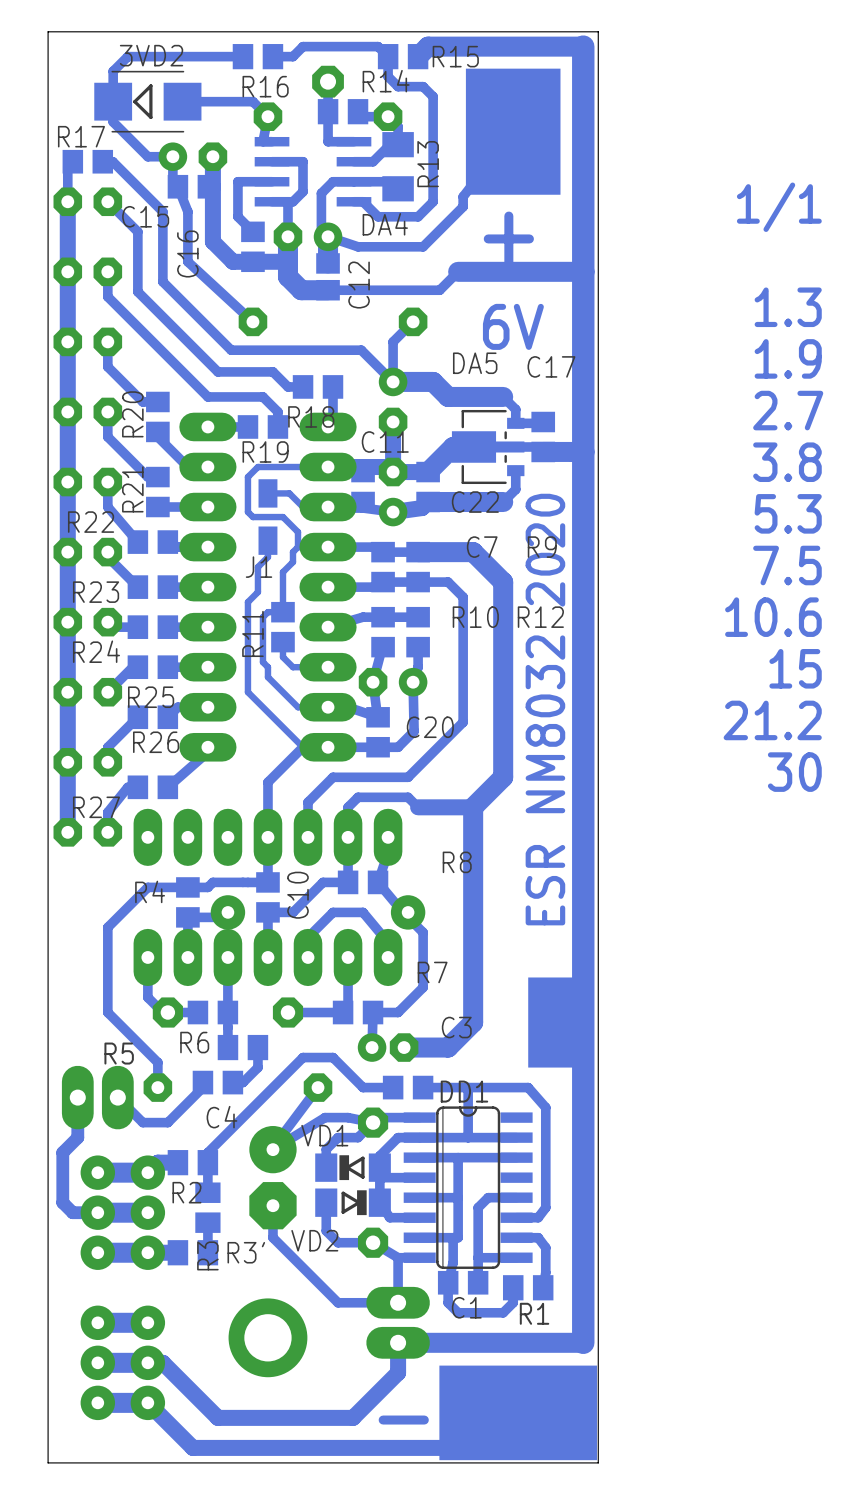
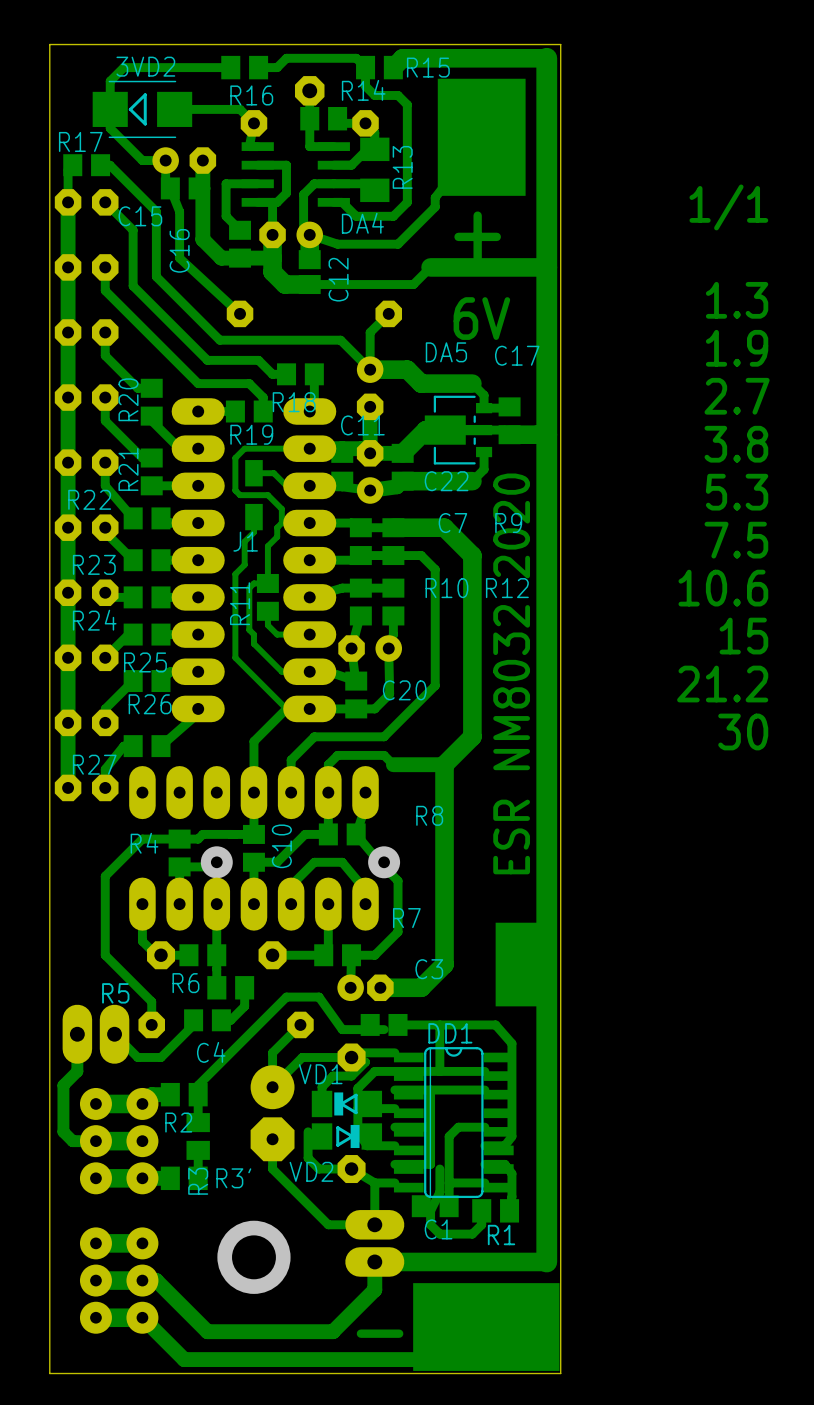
track: (333, 1057) (363, 1087) (393, 1087) -> (314, 997) (319, 997) (342, 1029) (384, 1029)
track: (318, 1087) (272, 1149) (325, 1117) (348, 1117) (373, 1122) (358, 1137) (338, 1137) (326, 1149) (326, 1167) -> (300, 1024) (272, 1052) (272, 1087) (302, 1057) (342, 1057) (365, 1062) (351, 1076) (332, 1076) (322, 1087) (322, 1103)
VD1 position: (353, 1167) -> (346, 1103)
part position: (272, 1177) -> (272, 1113)
DD1 position: (468, 1187) -> (453, 1122)
VD2 position: (353, 1202) -> (346, 1136)
track: (272, 1205) (272, 1237) (338, 1302) (348, 1302) -> (272, 1139) (272, 1169) (328, 1224)
track: (453, 1237) (453, 1262) (448, 1282) (448, 1302) (458, 1312) (468, 1312) -> (439, 1169) (439, 1192) (430, 1210) (430, 1224) (439, 1234)

